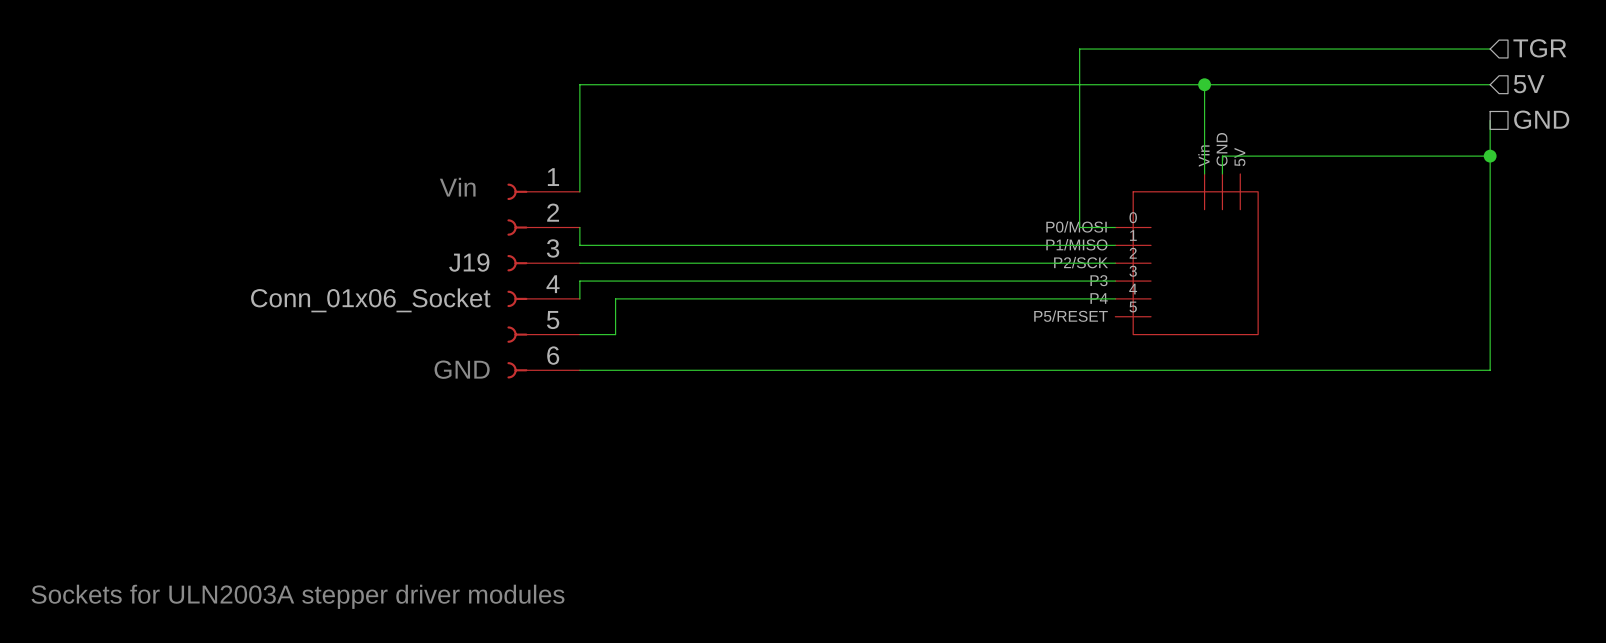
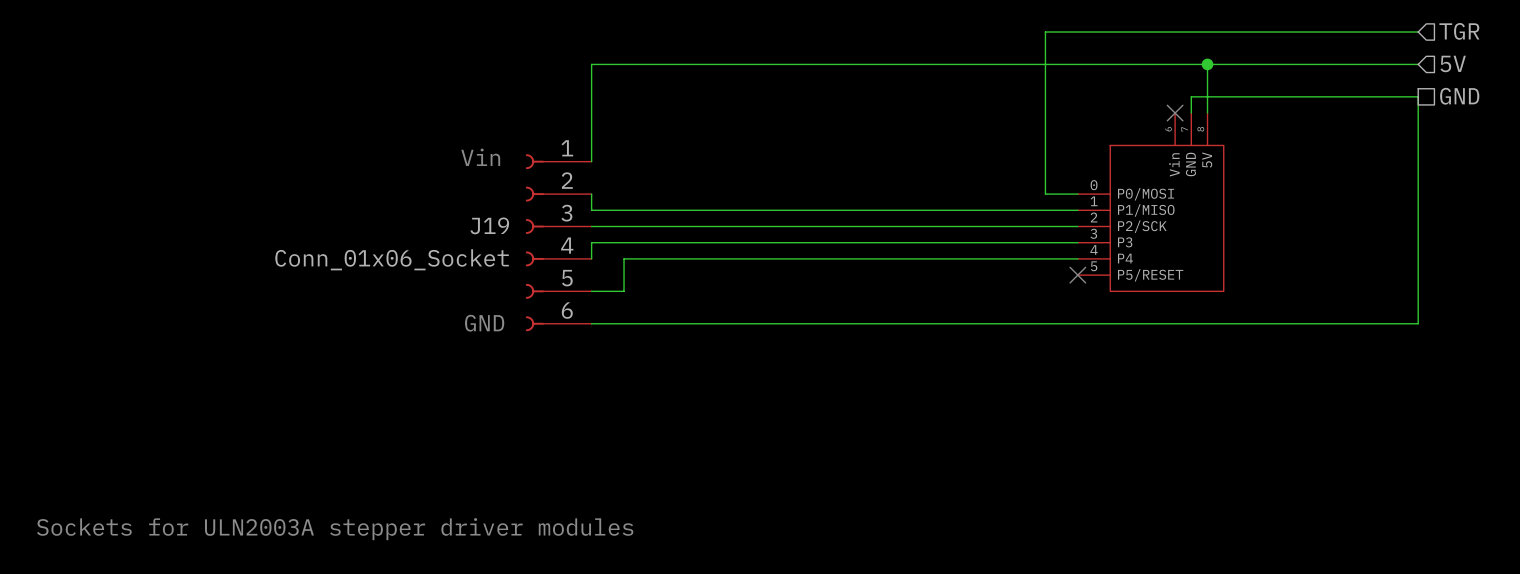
wire: (1204, 84) (1204, 173) -> none
junction position: (1204, 84) -> (1207, 64)
wire: none -> (1207, 64) (1207, 113)
wire: none -> (1418, 96) (1191, 96) (1191, 113)
no-connect mark: none -> (1175, 113)
wire: (1490, 156) (1222, 156) (1222, 173) -> none
junction: (1490, 156) -> none
part: none -> (1150, 202)
part: (1186, 254) -> none
no-connect mark: none -> (1077, 275)

